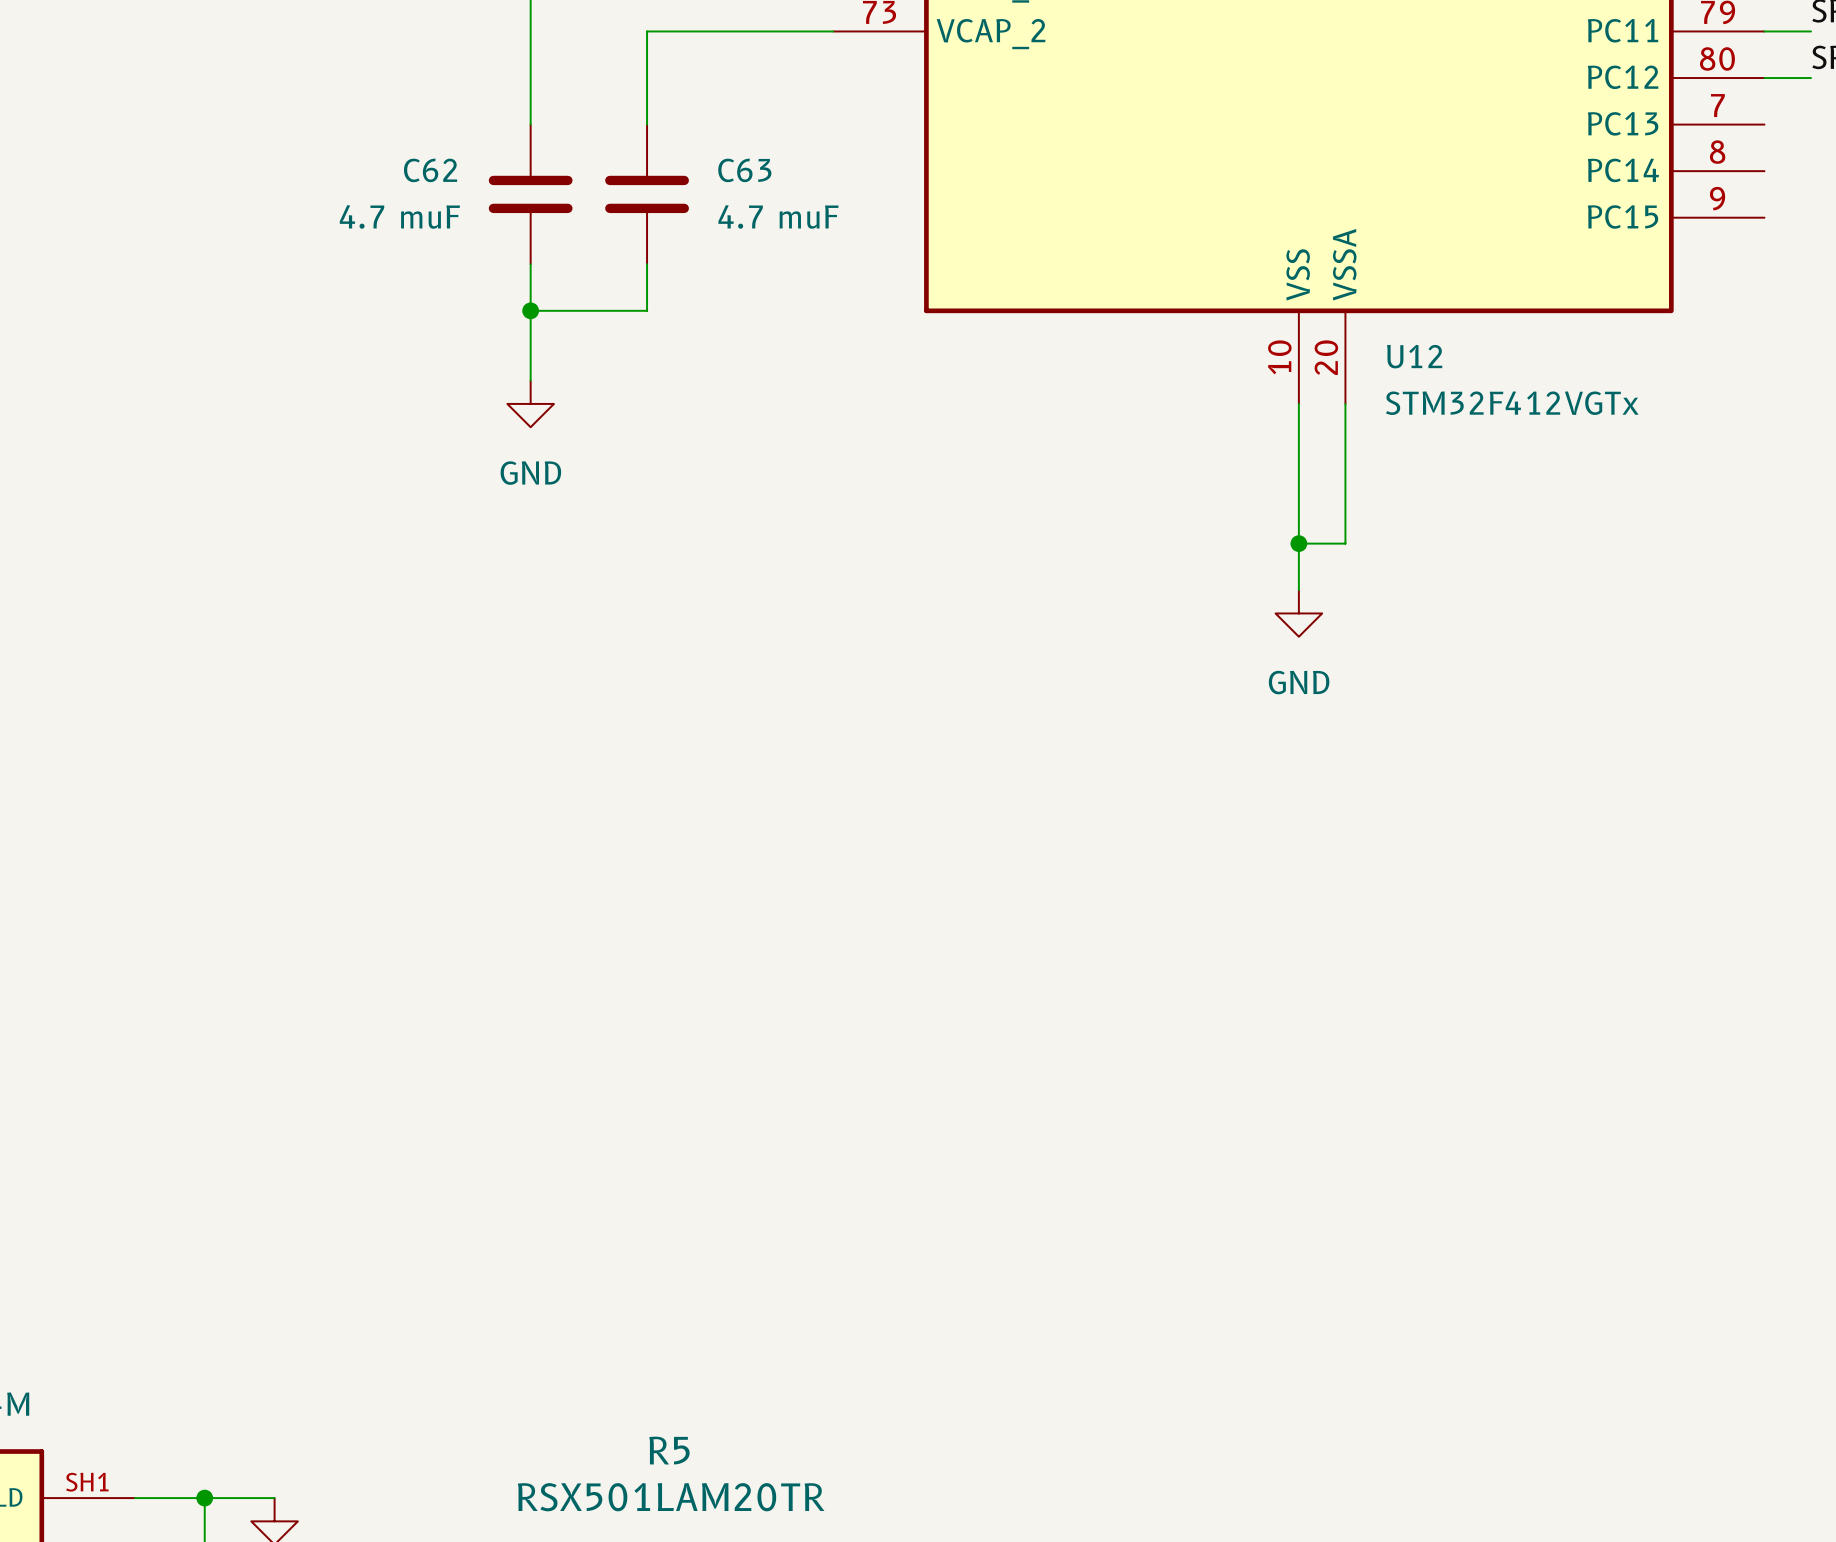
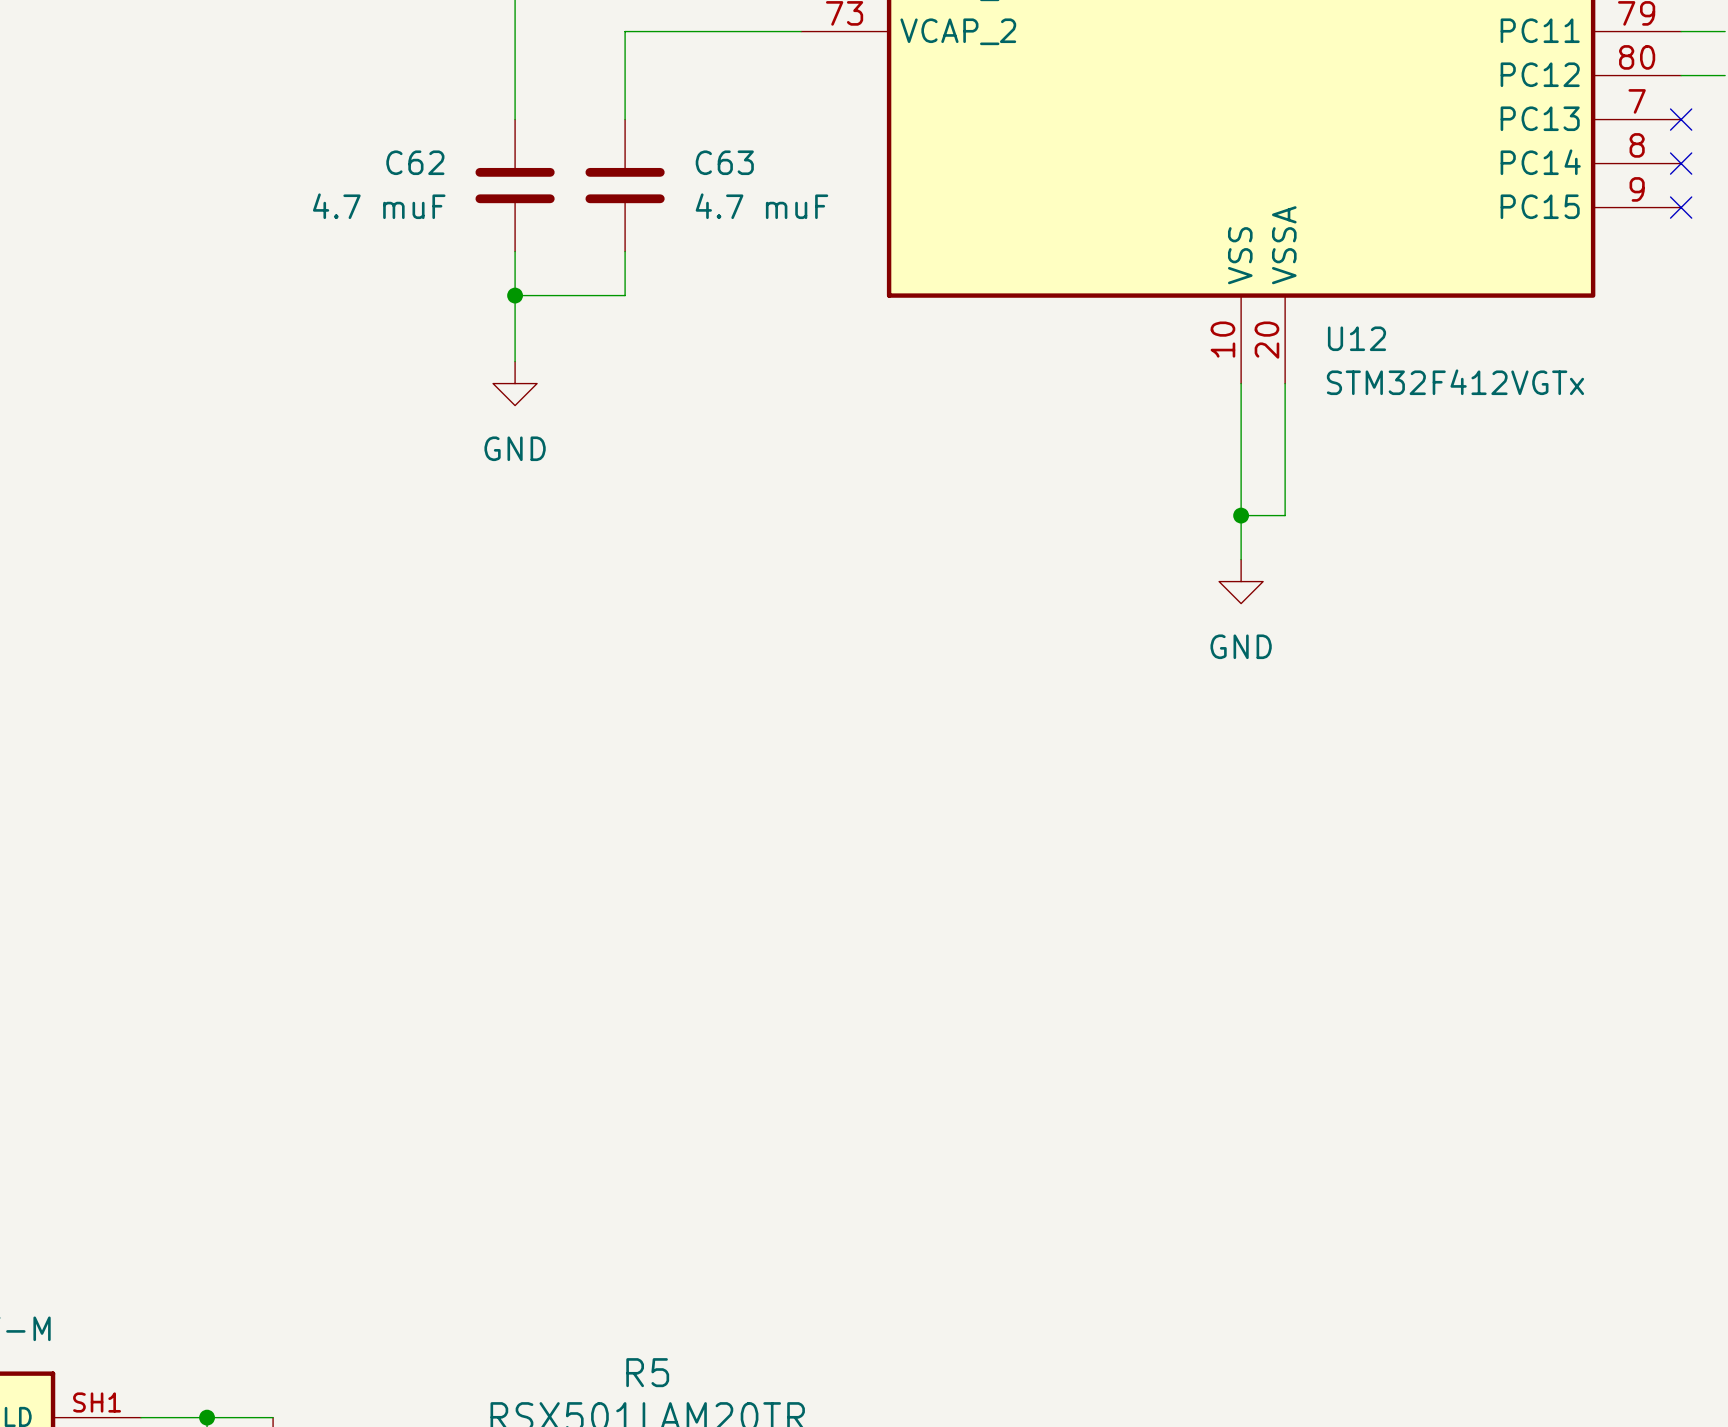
no-connect mark: none -> (1681, 119)
no-connect mark: none -> (1681, 163)
no-connect mark: none -> (1681, 207)

